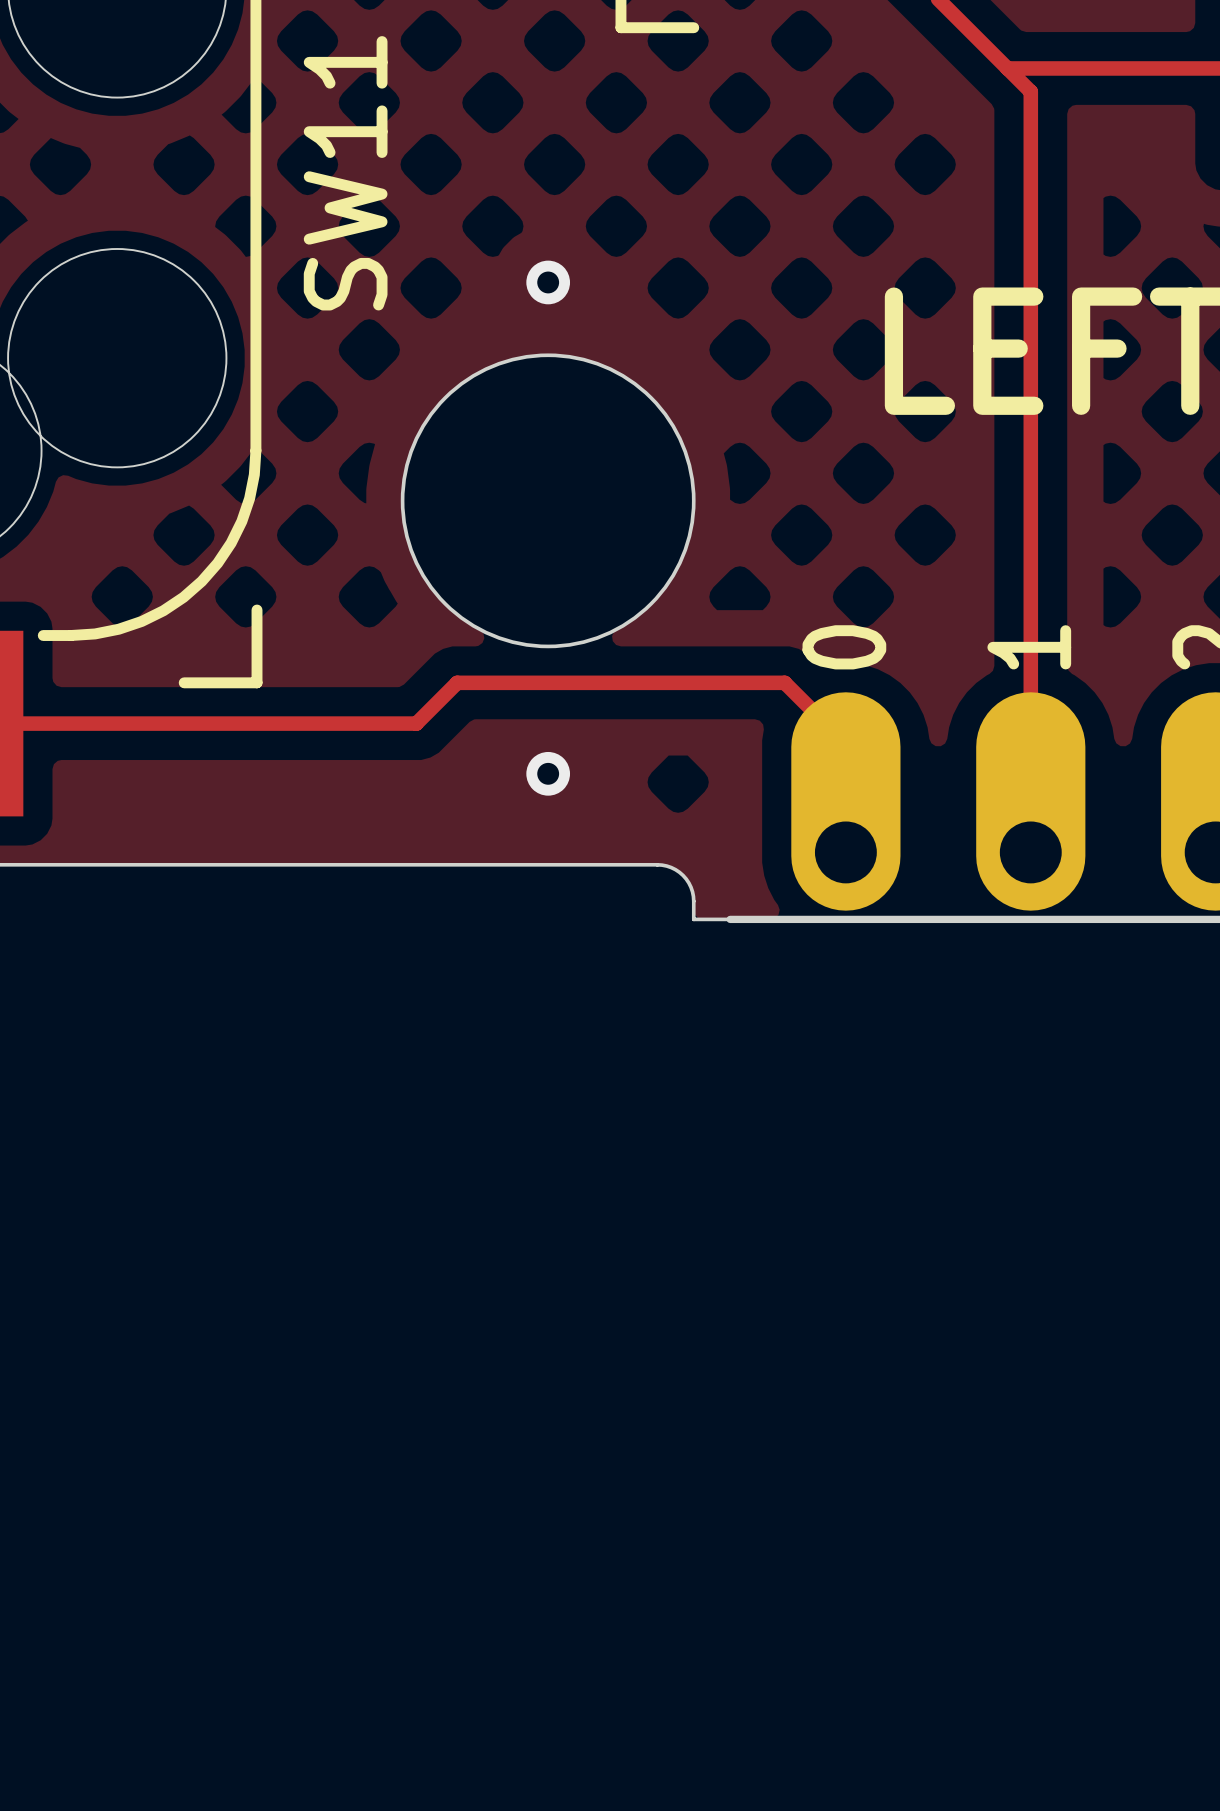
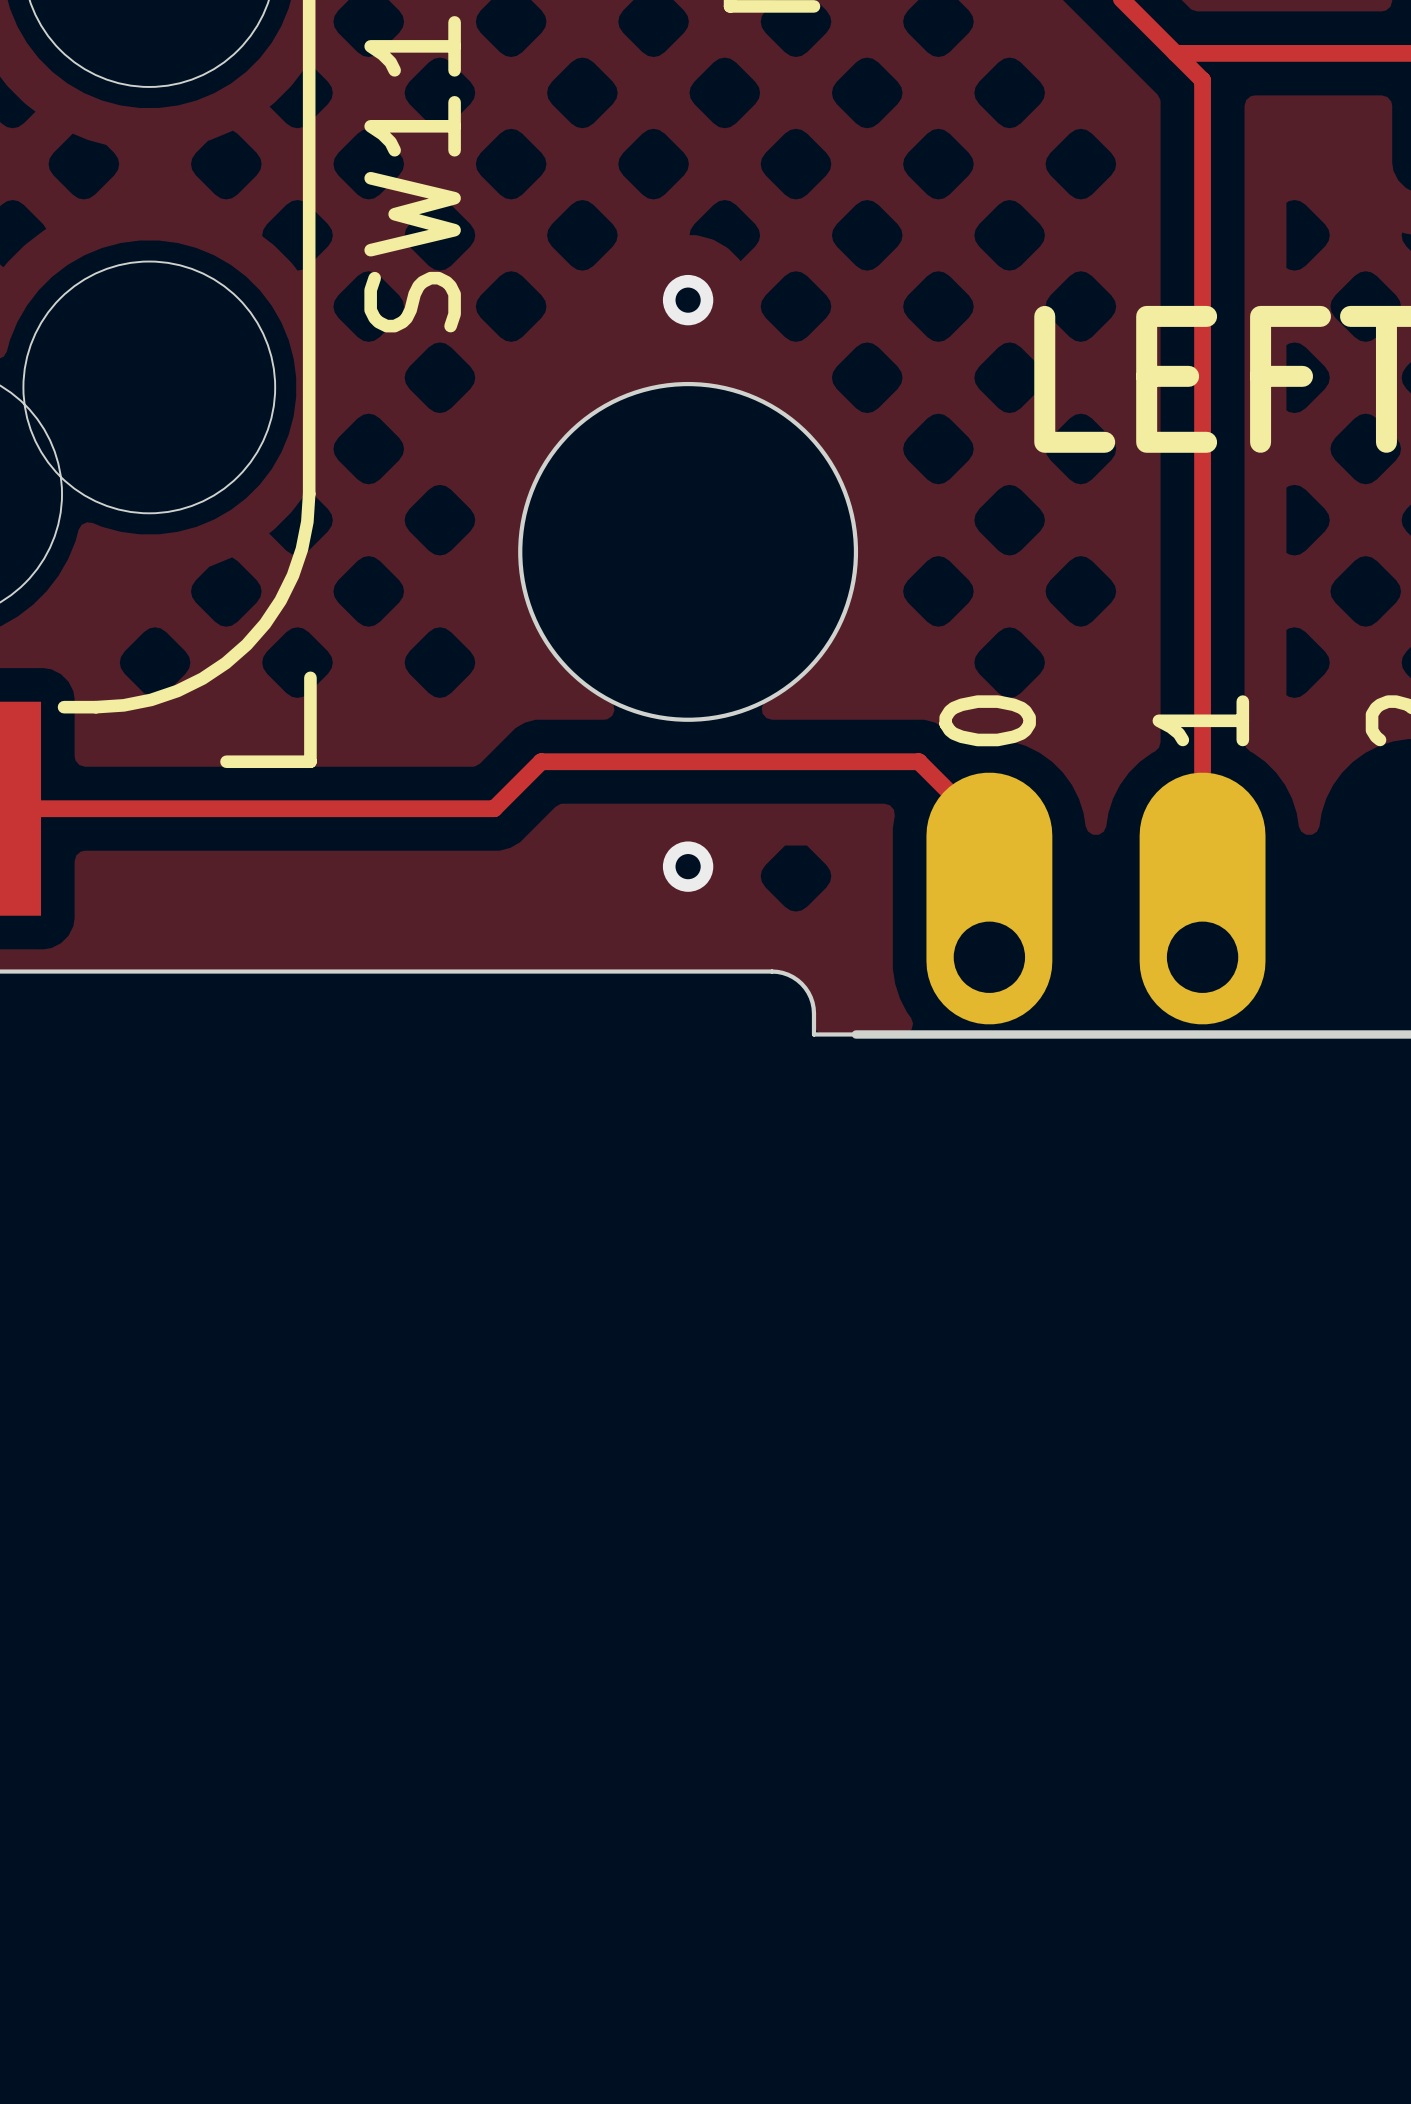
via position: (548, 282) -> (688, 300)
round board edge position: (548, 500) -> (688, 551)
via position: (548, 773) -> (688, 866)

